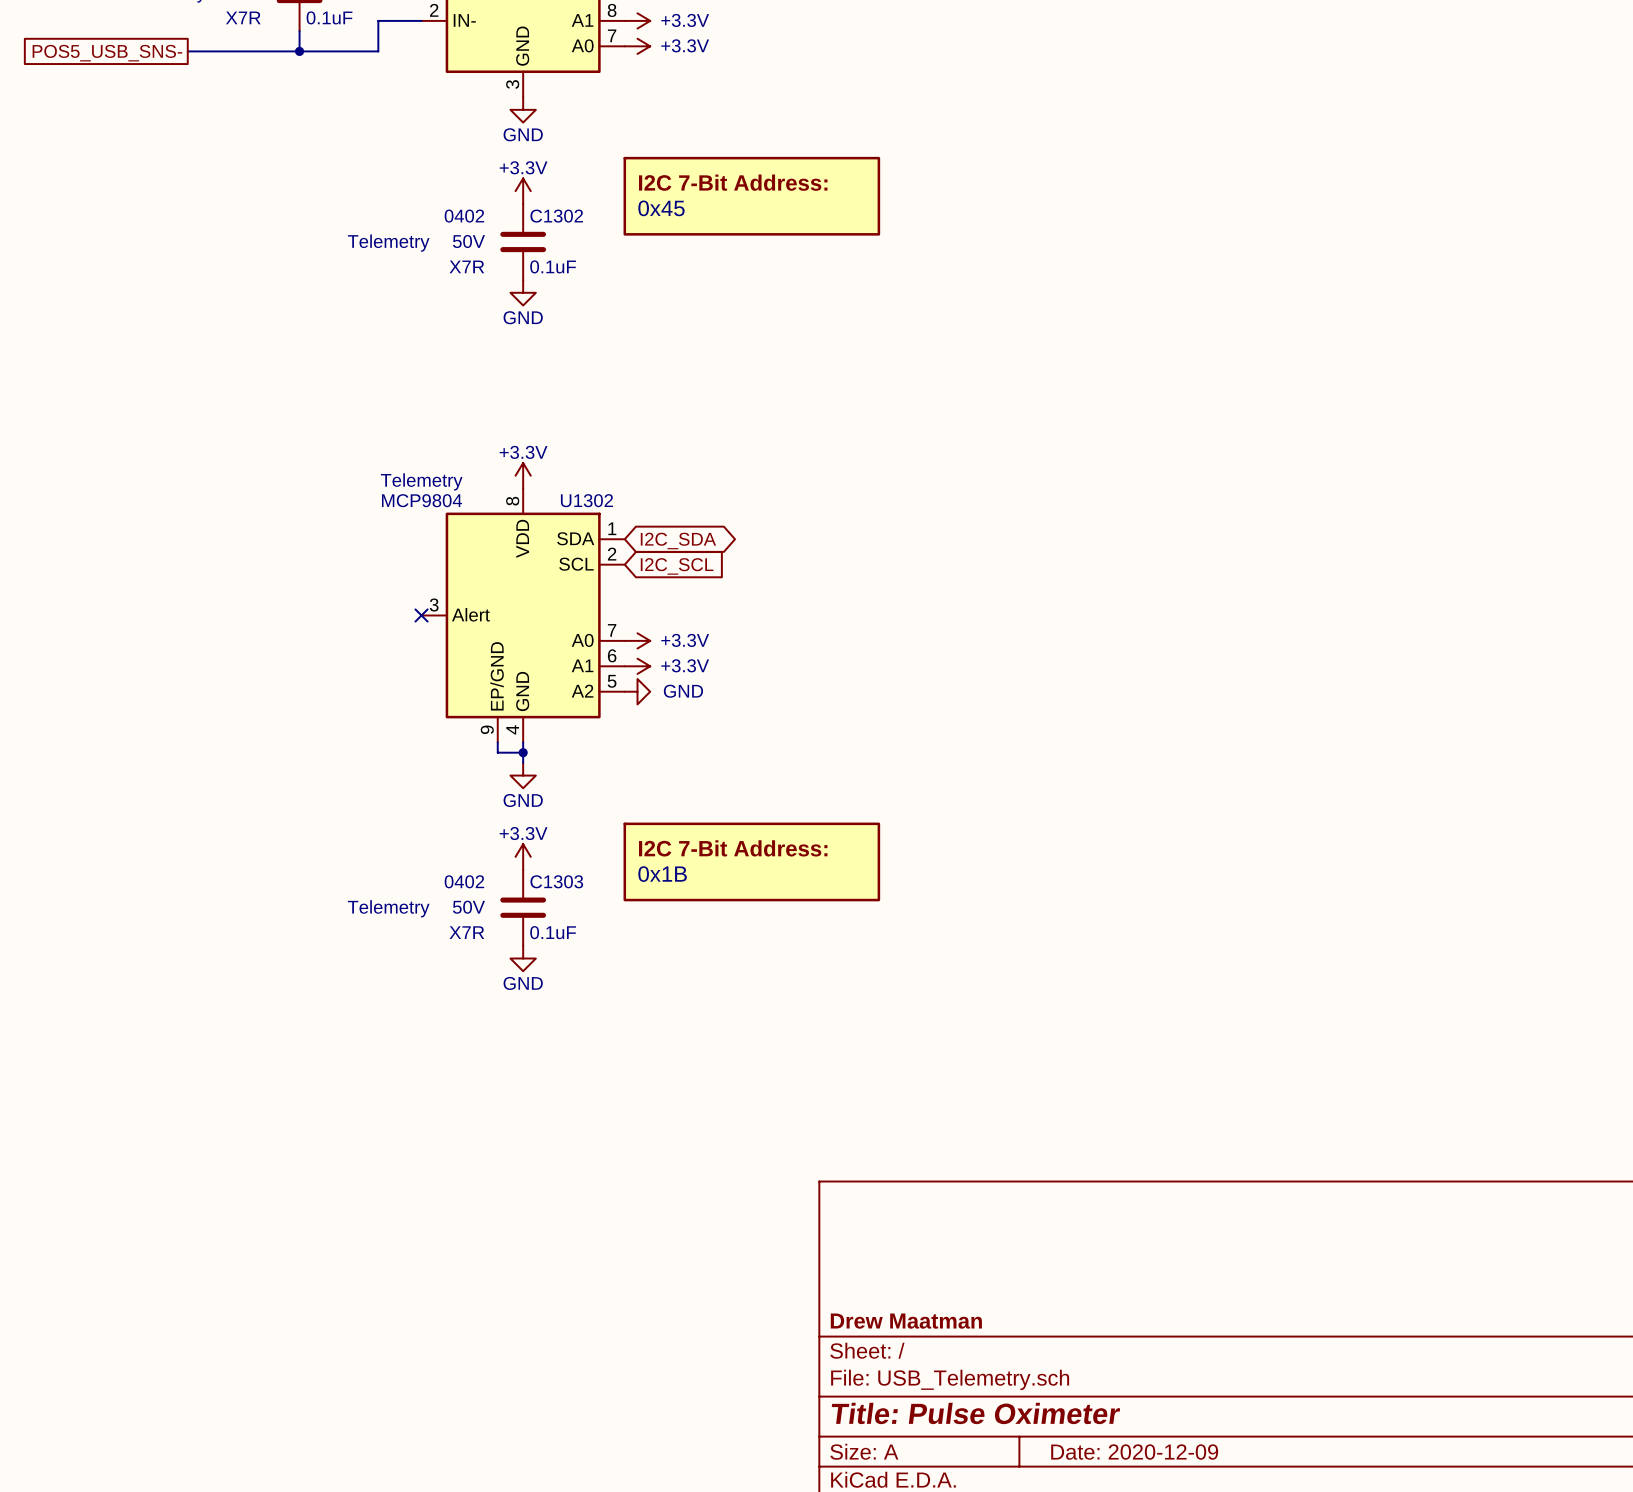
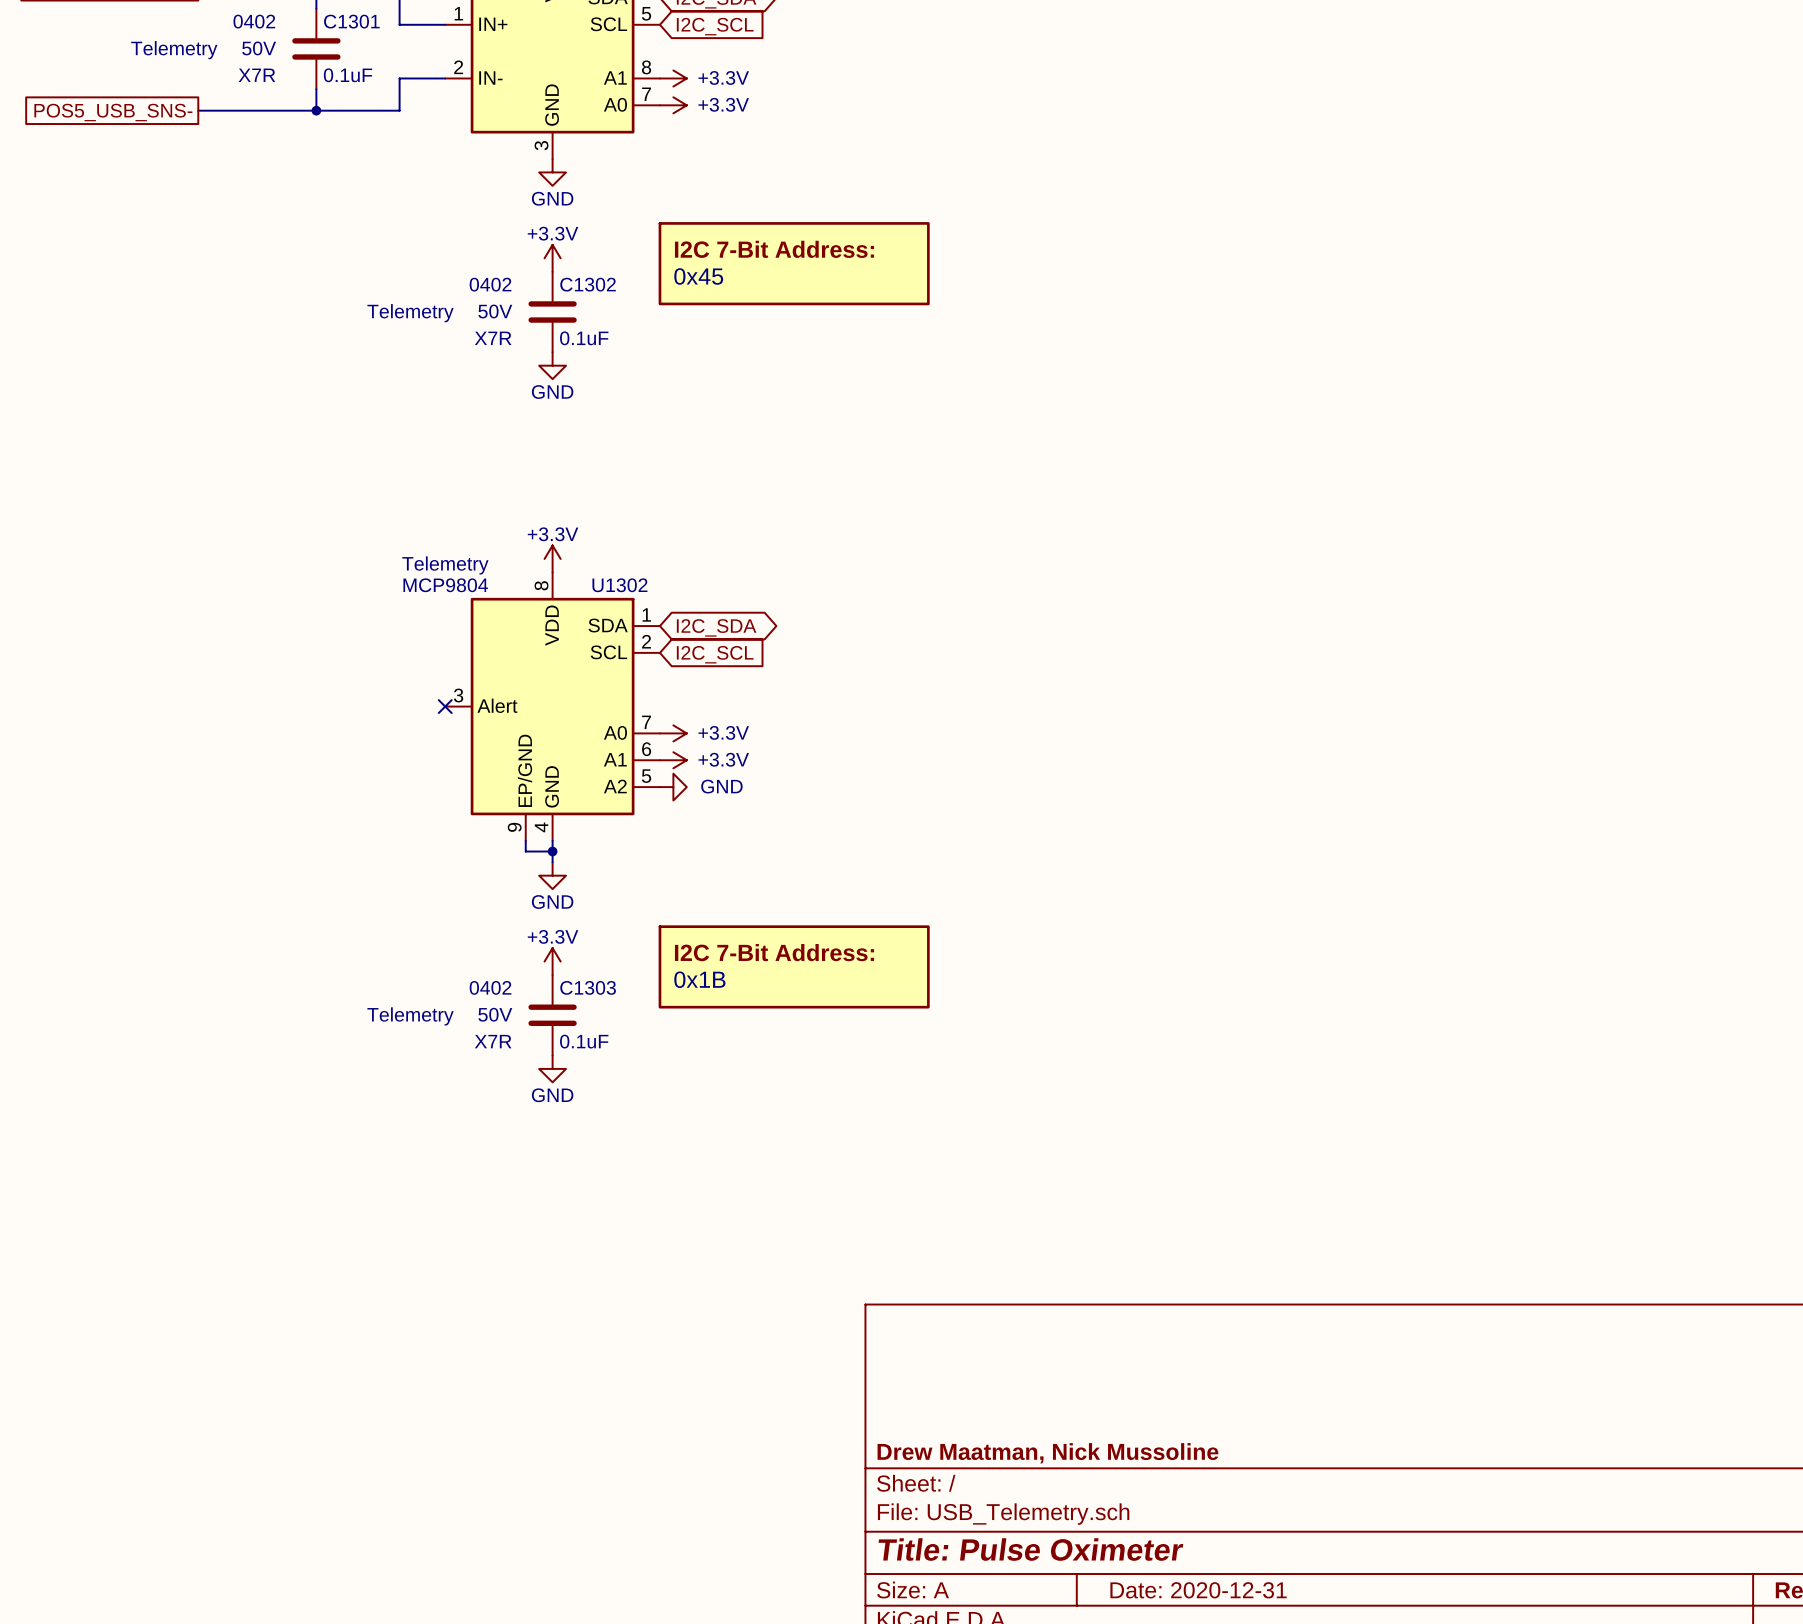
title block: Drew Maatman (906, 1321) -> Drew Maatman, Nick Mussoline (1047, 1453)
title block: Date: 2020-12-09 (1134, 1452) -> Date: 2020-12-31 (1198, 1590)

